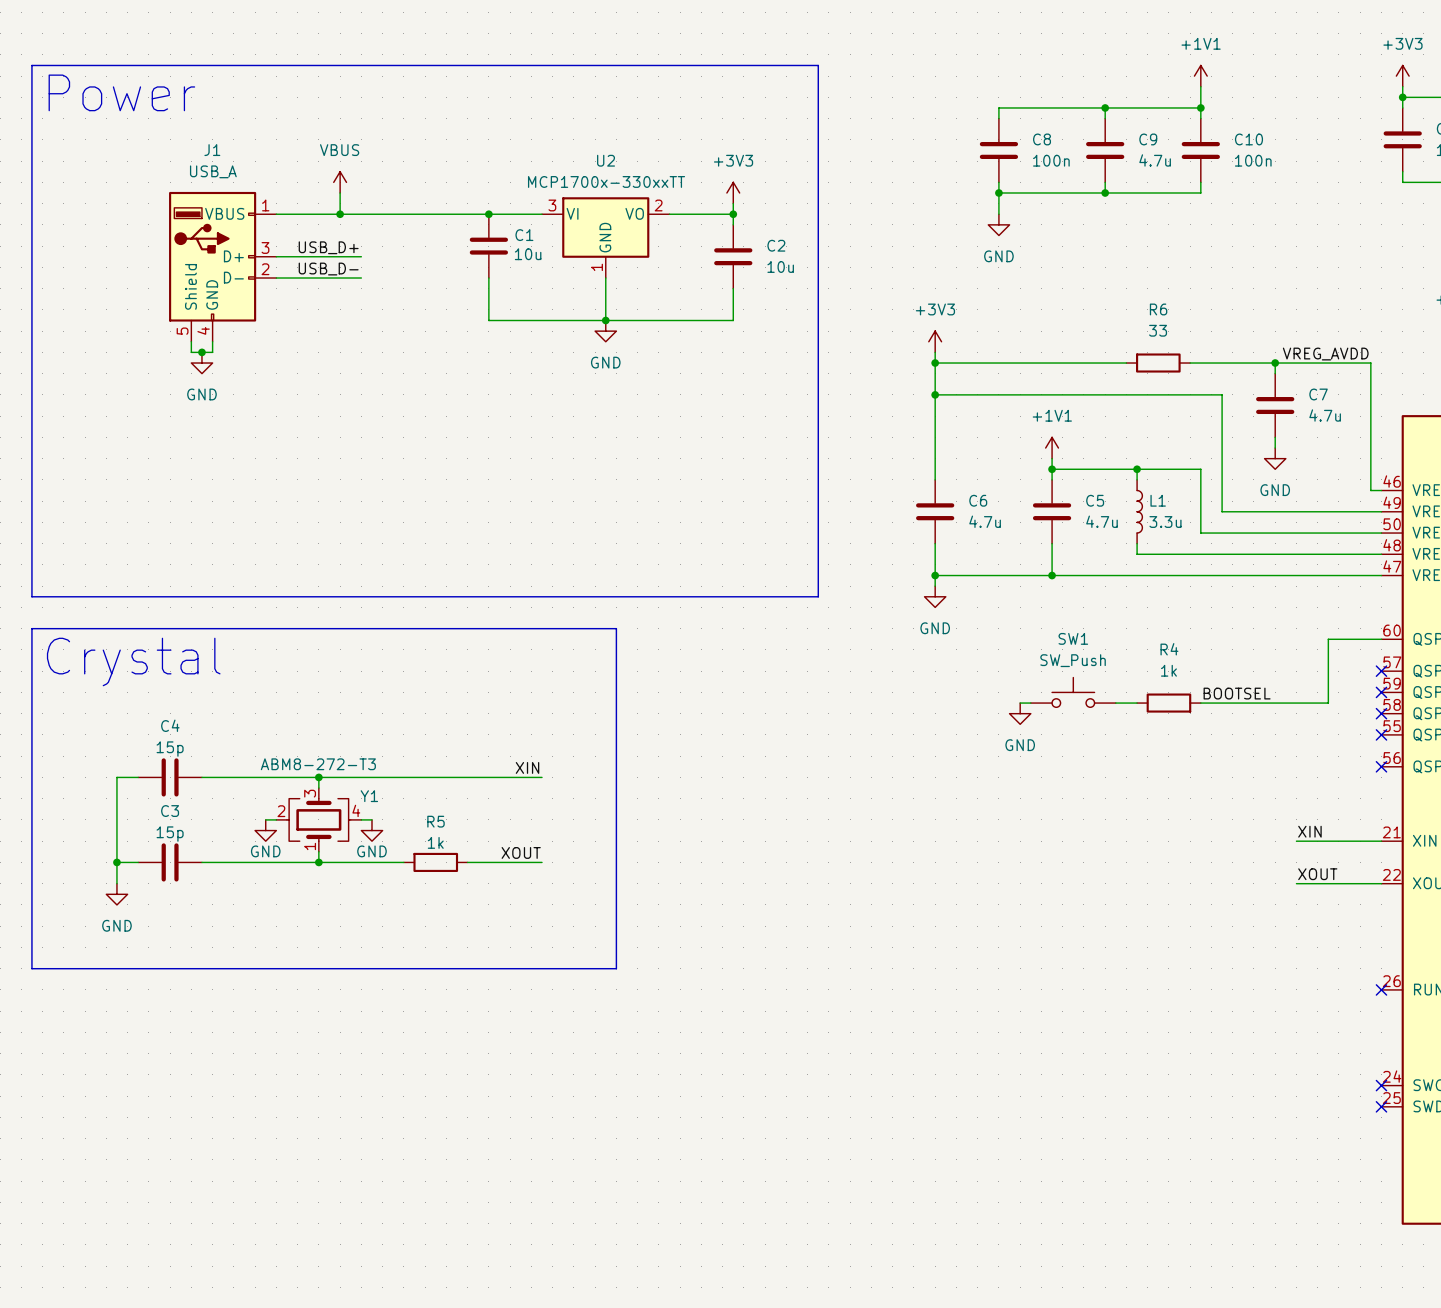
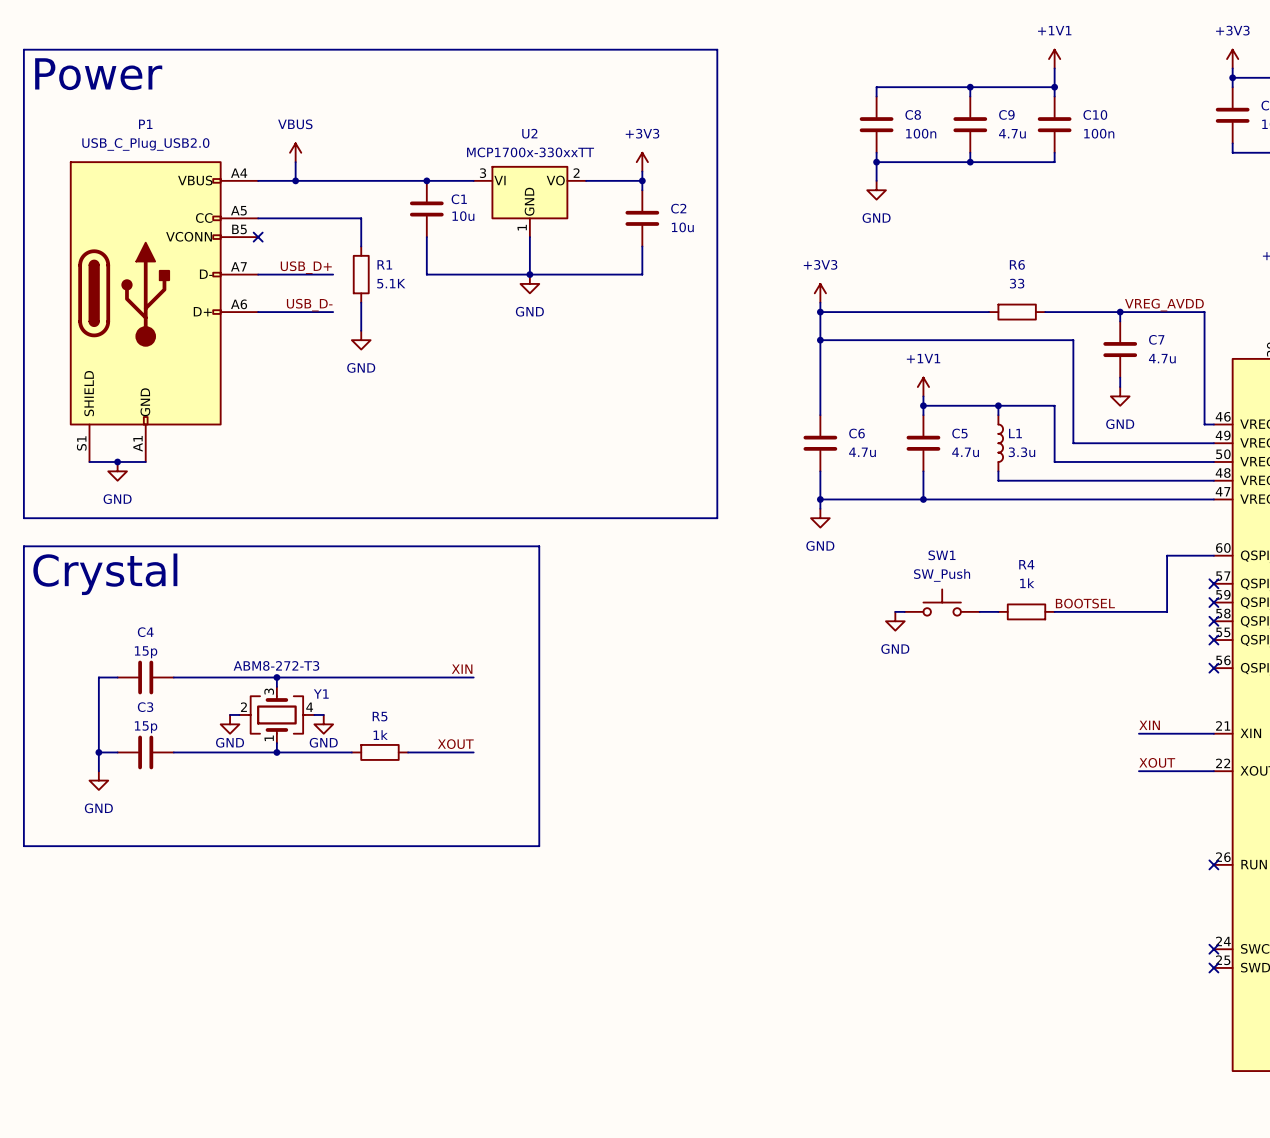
label position: USB_D+ (328, 247) -> USB_D+ (306, 267)
wire: none -> (314, 218) (361, 218) (361, 246)
J1: USB_A (222, 266) -> none
label position: USB_D- (328, 269) -> USB_D- (309, 305)
wire: (276, 278) (361, 278) -> (258, 274) (333, 274)
no-connect mark: none -> (258, 237)
R1: none -> 5.1K (361, 274)
junction: (201, 352) -> none
wire: none -> (361, 302) (361, 330)
P1: none -> USB_C_Plug_USB2.0 (163, 311)
power symbol: GND (201, 363) -> none
wire: none -> (258, 312) (333, 312)
power symbol: none -> GND (361, 340)
wire: none -> (89, 461) (145, 461)
junction: none -> (117, 461)
power symbol: none -> GND (117, 471)

